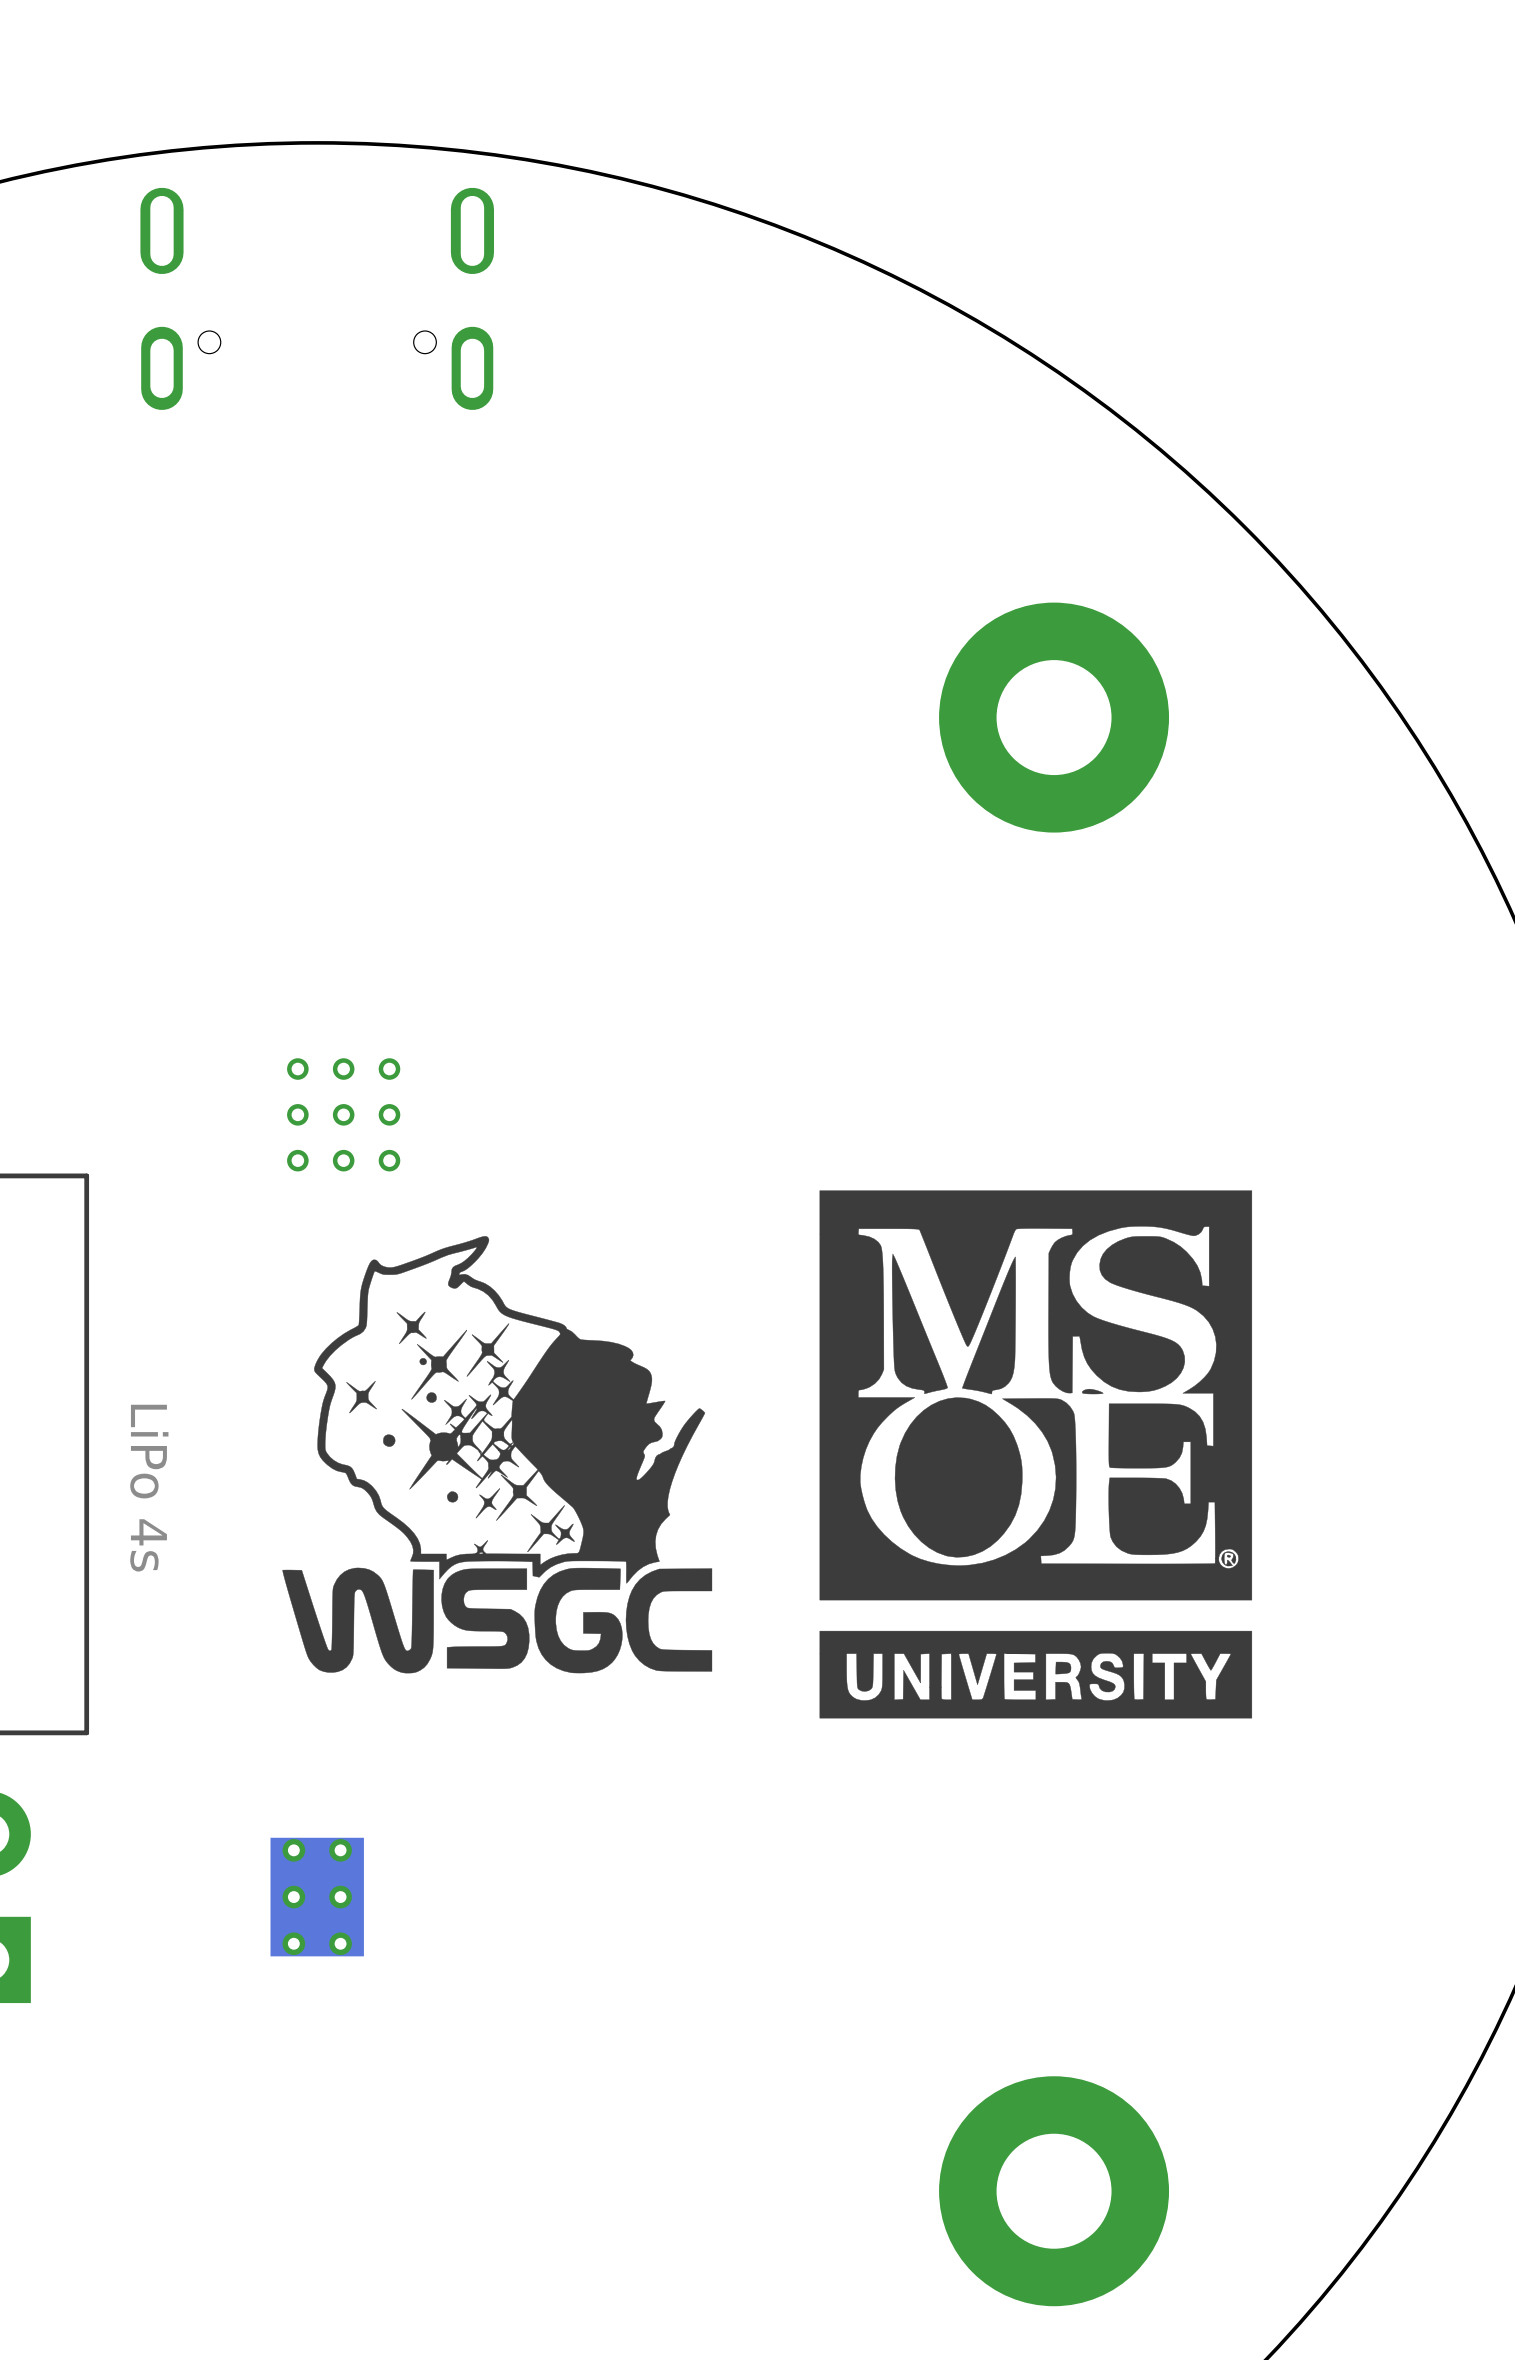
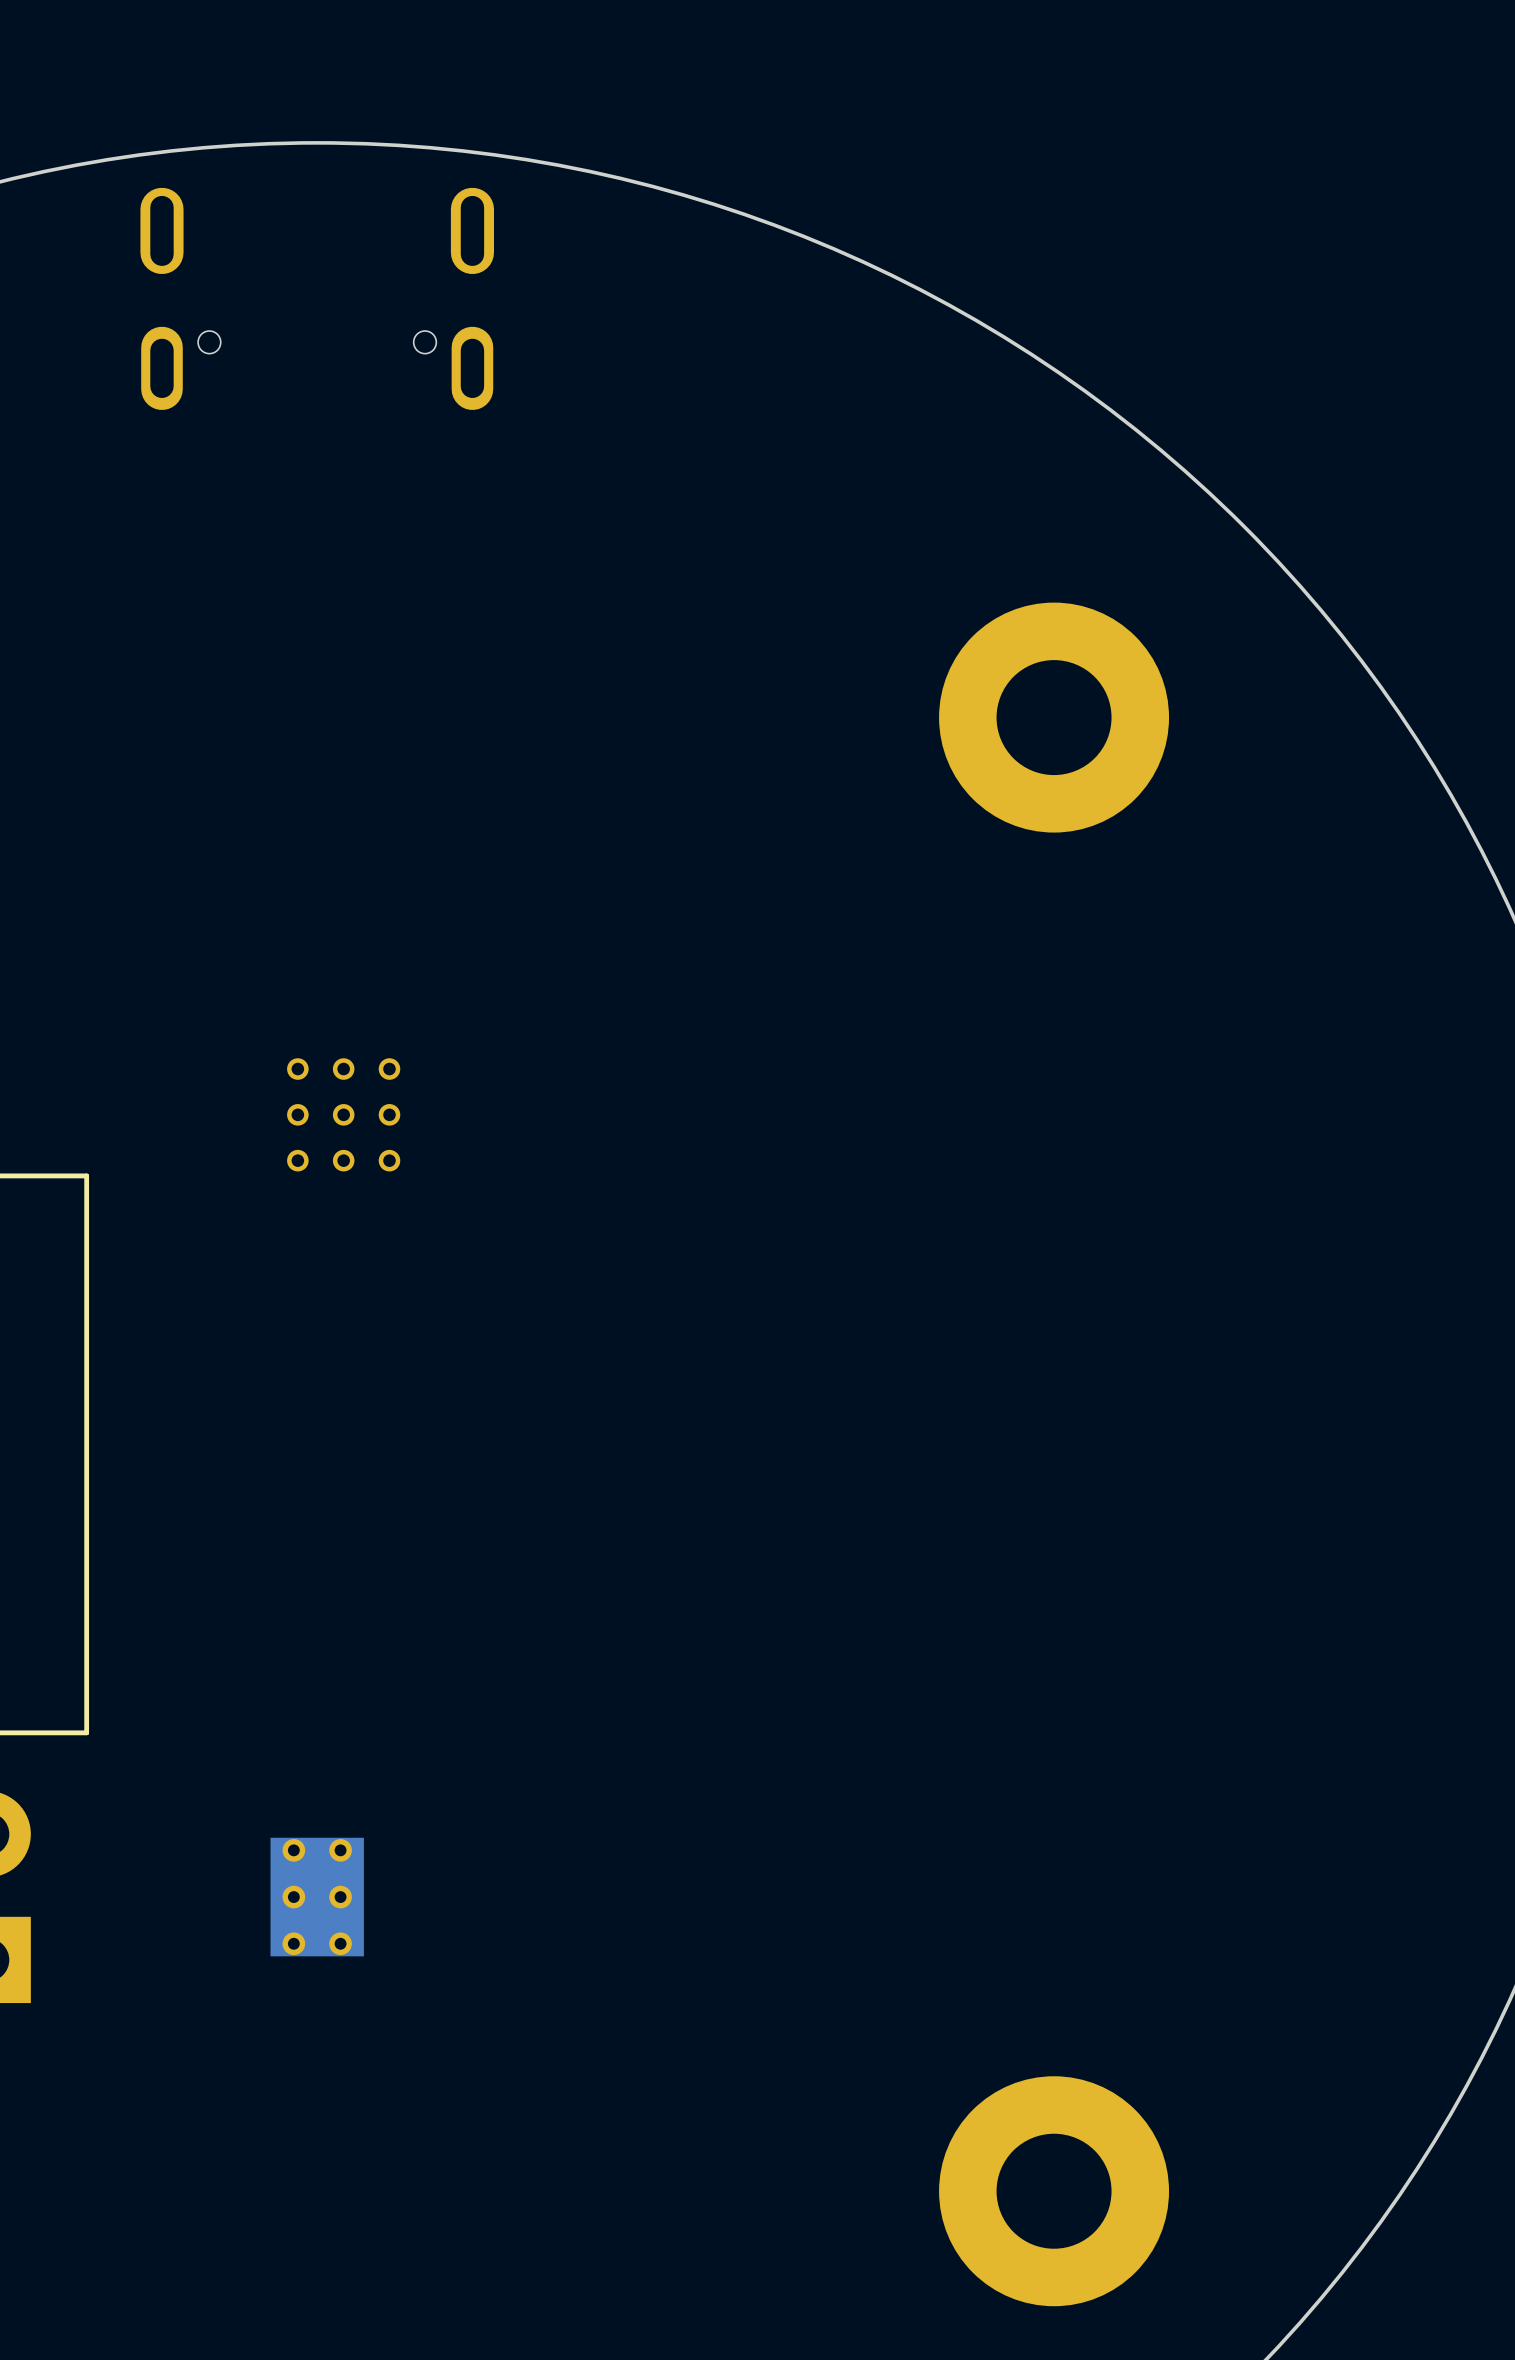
drawing: [819, 1190, 1253, 1719] -> none
drawing: [282, 1236, 713, 1674] -> none
part value: LiPo 4s (149, 1488) -> none

